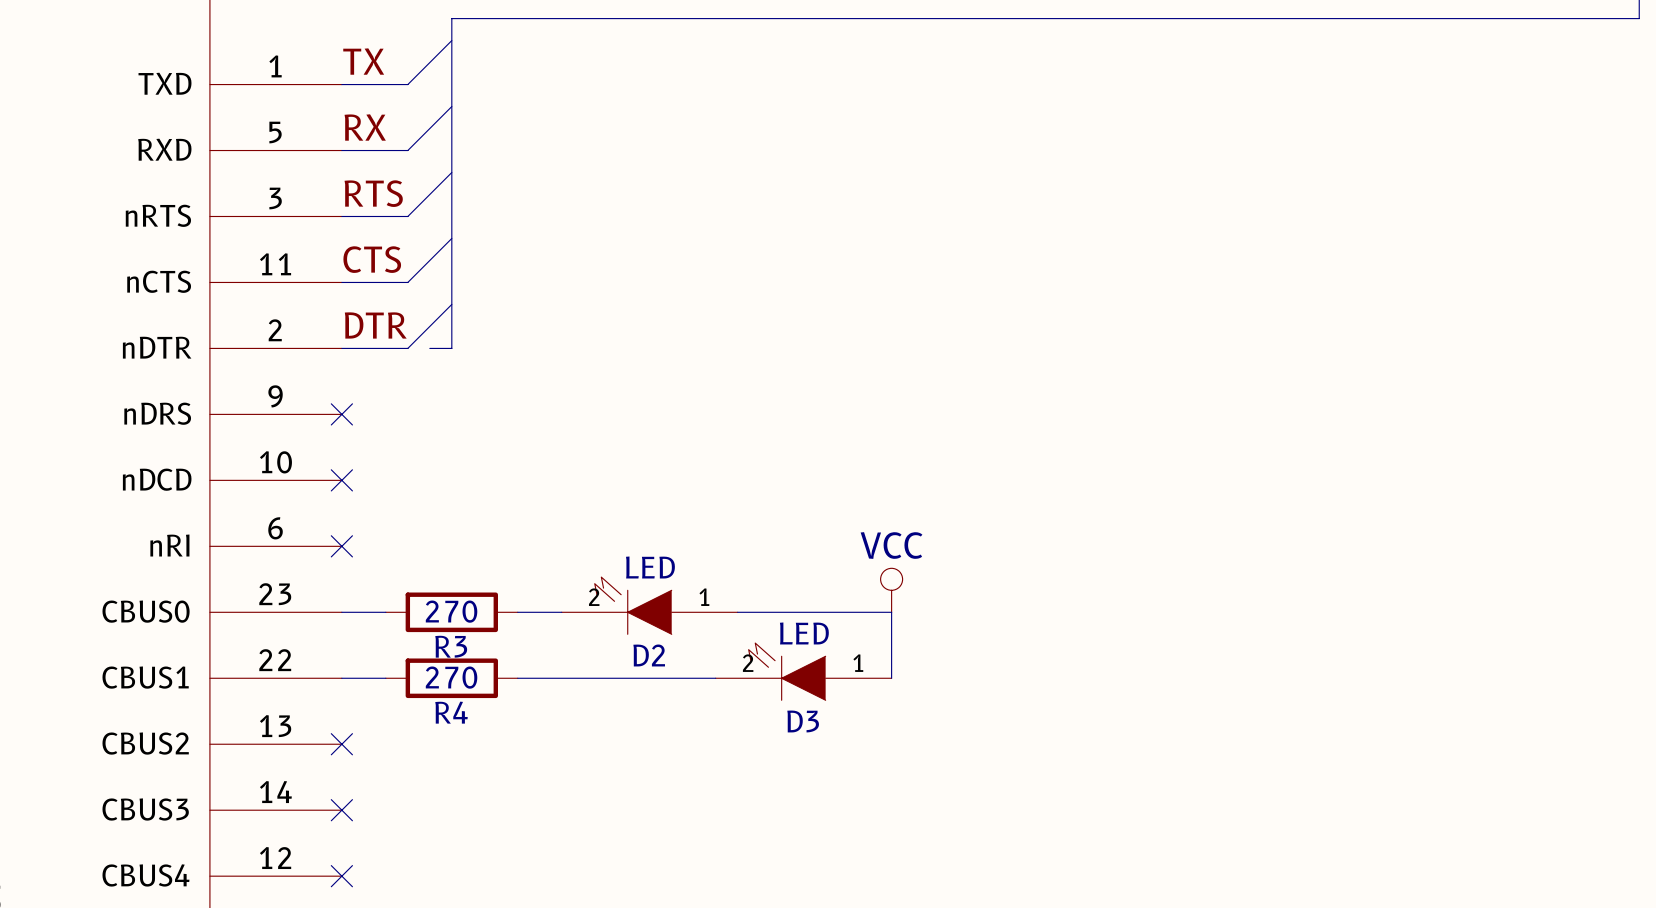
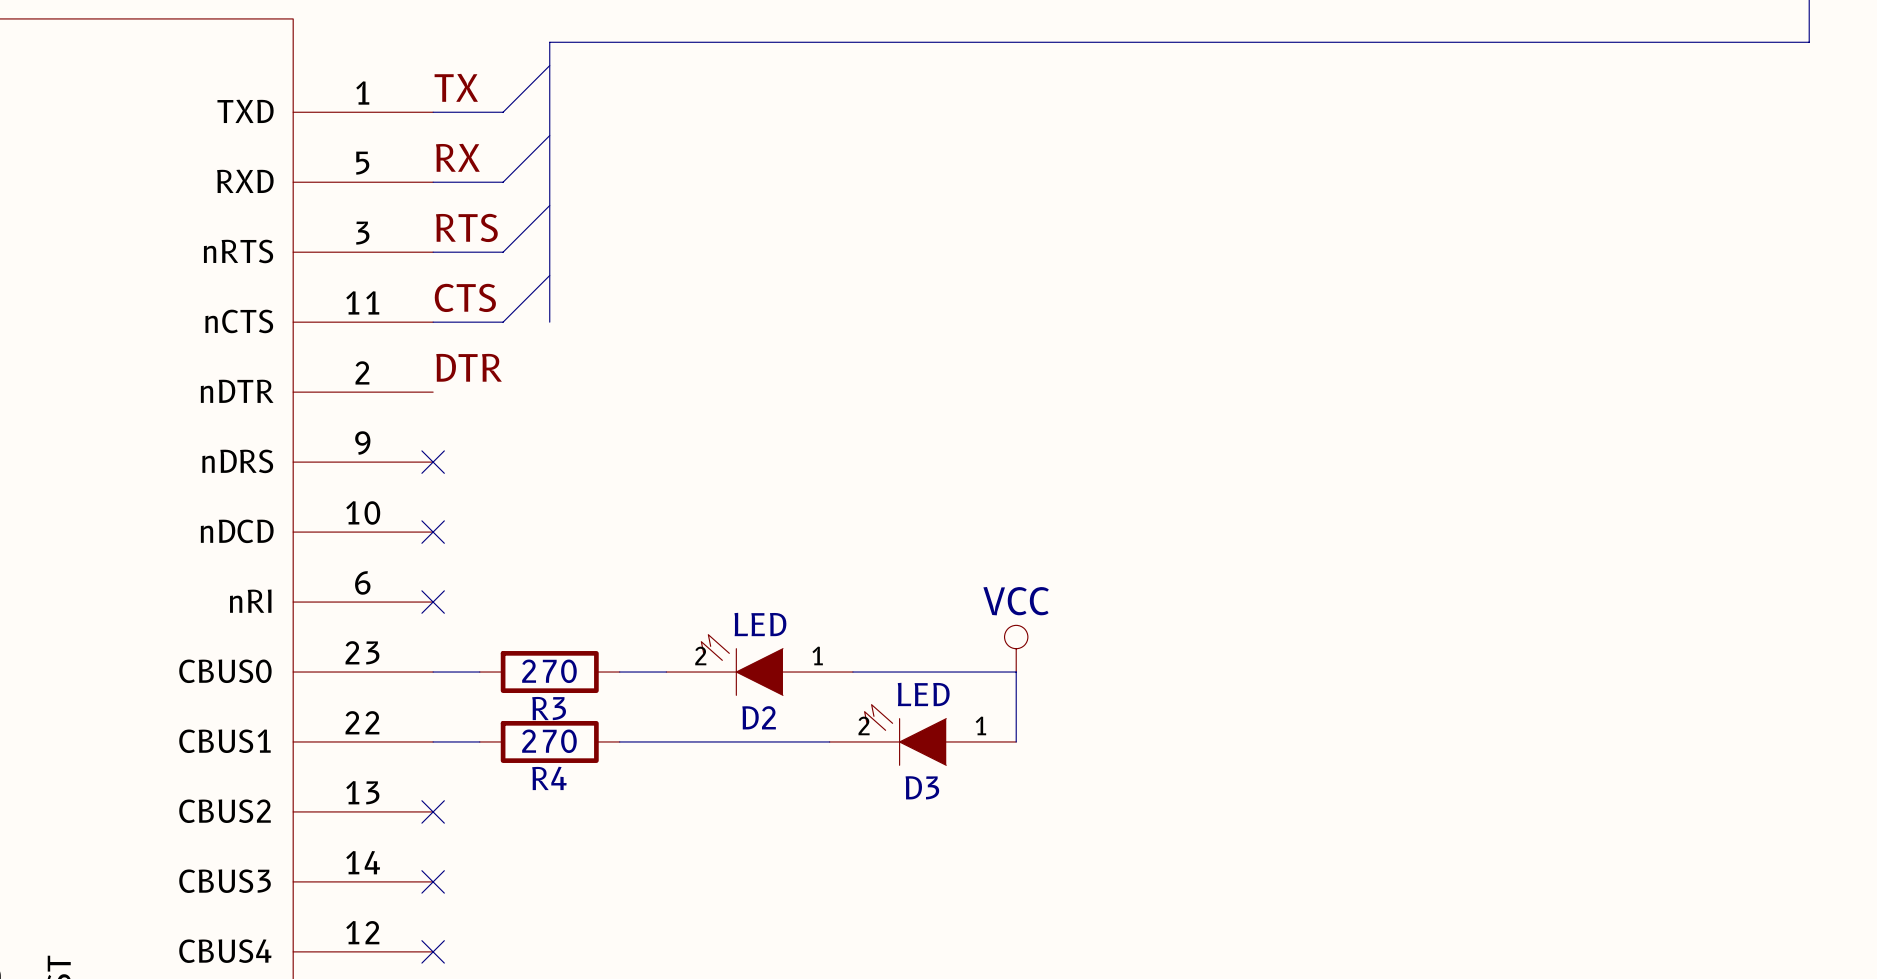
bus: (451, 282) (451, 348) (429, 348) -> none
wire: (451, 304) (407, 348) (341, 348) -> none

